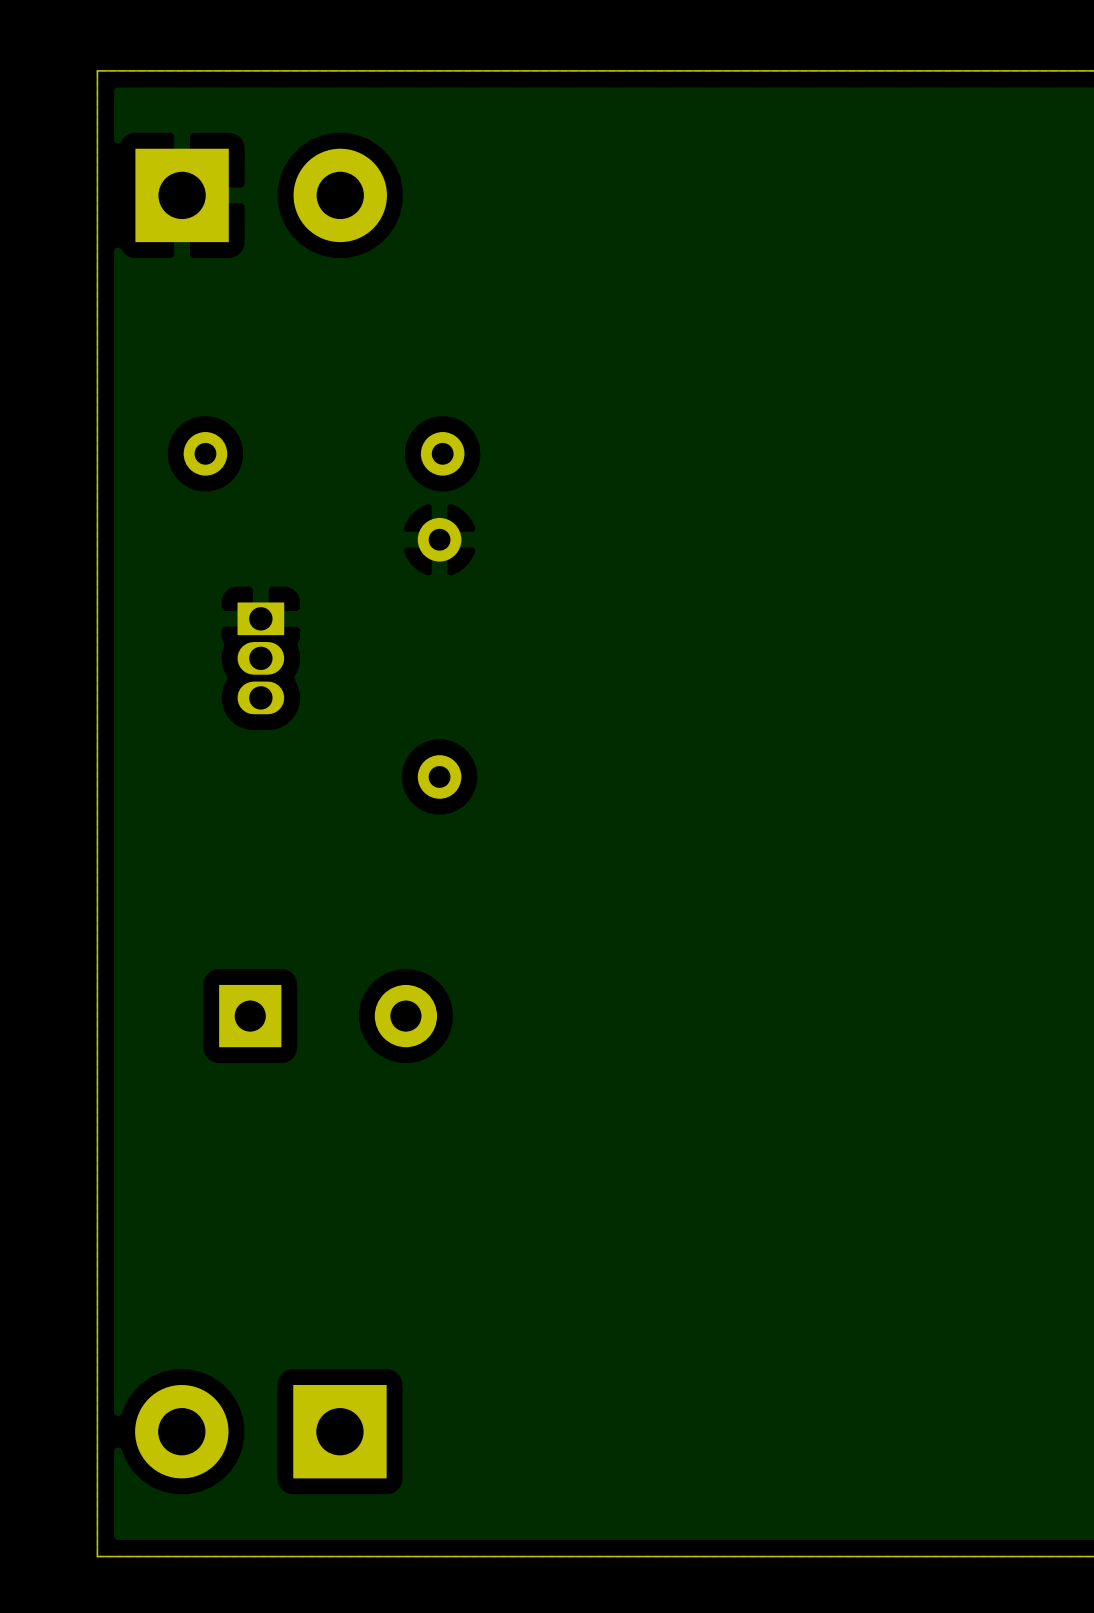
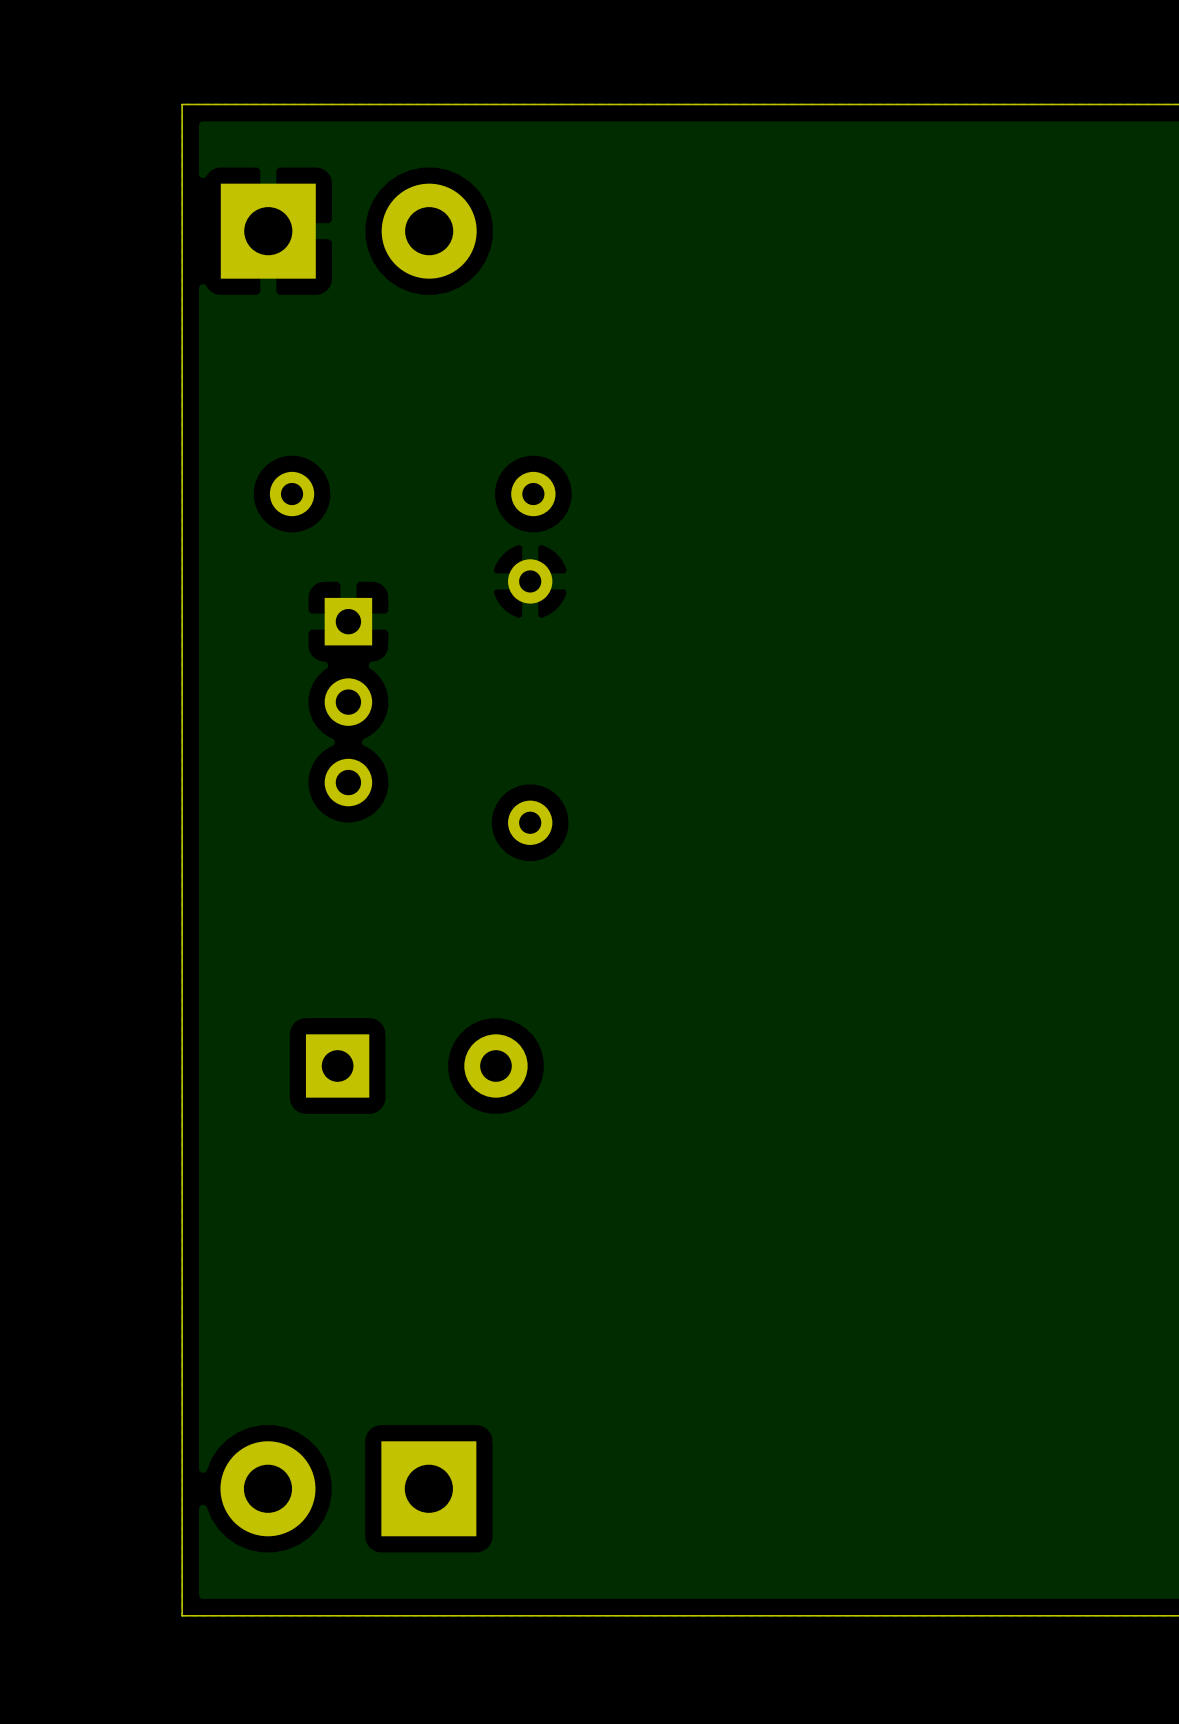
part footprint: [237, 602, 285, 715] -> [324, 597, 373, 807]

